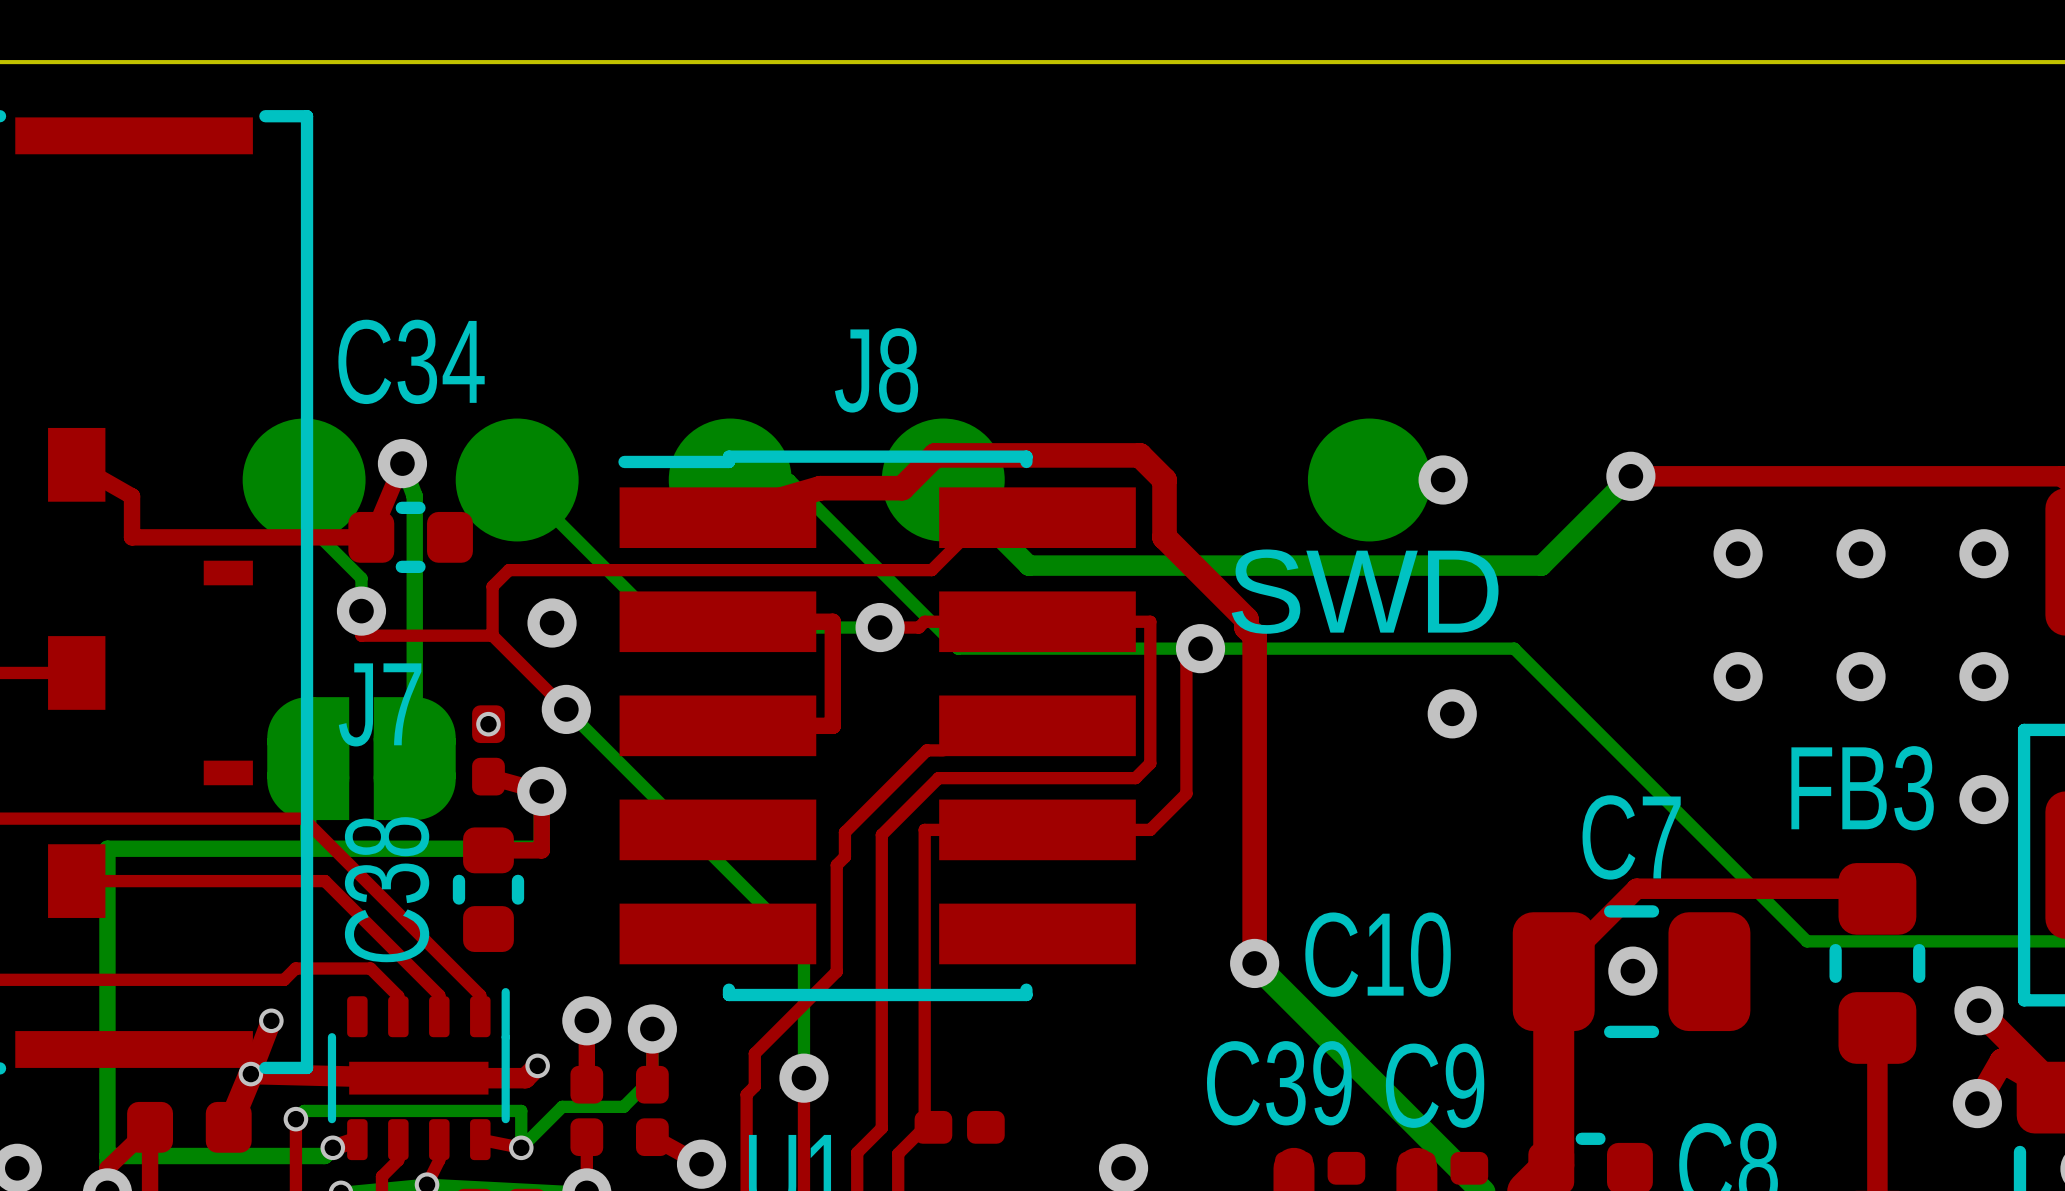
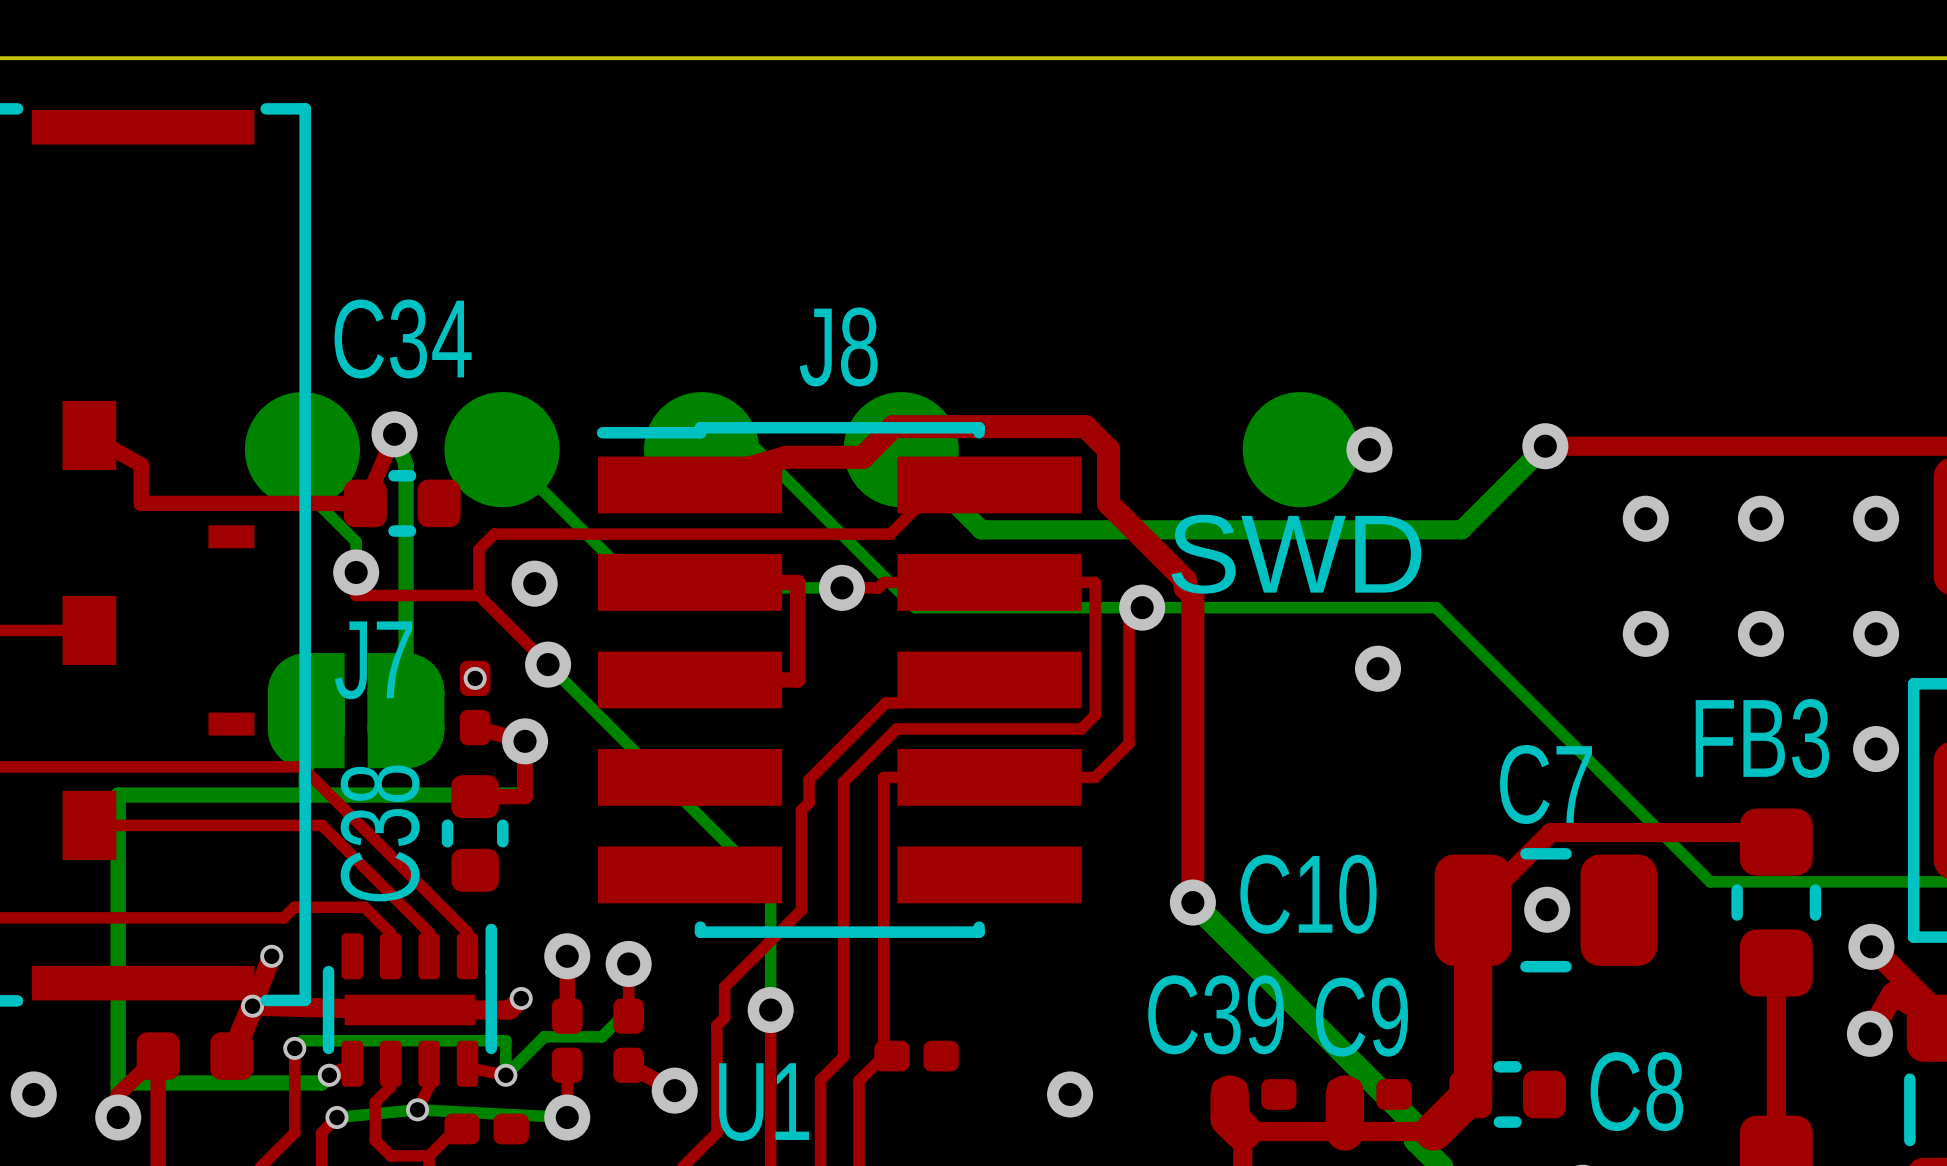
part footprint: [327, 988, 510, 1161] -> [322, 923, 498, 1087]

